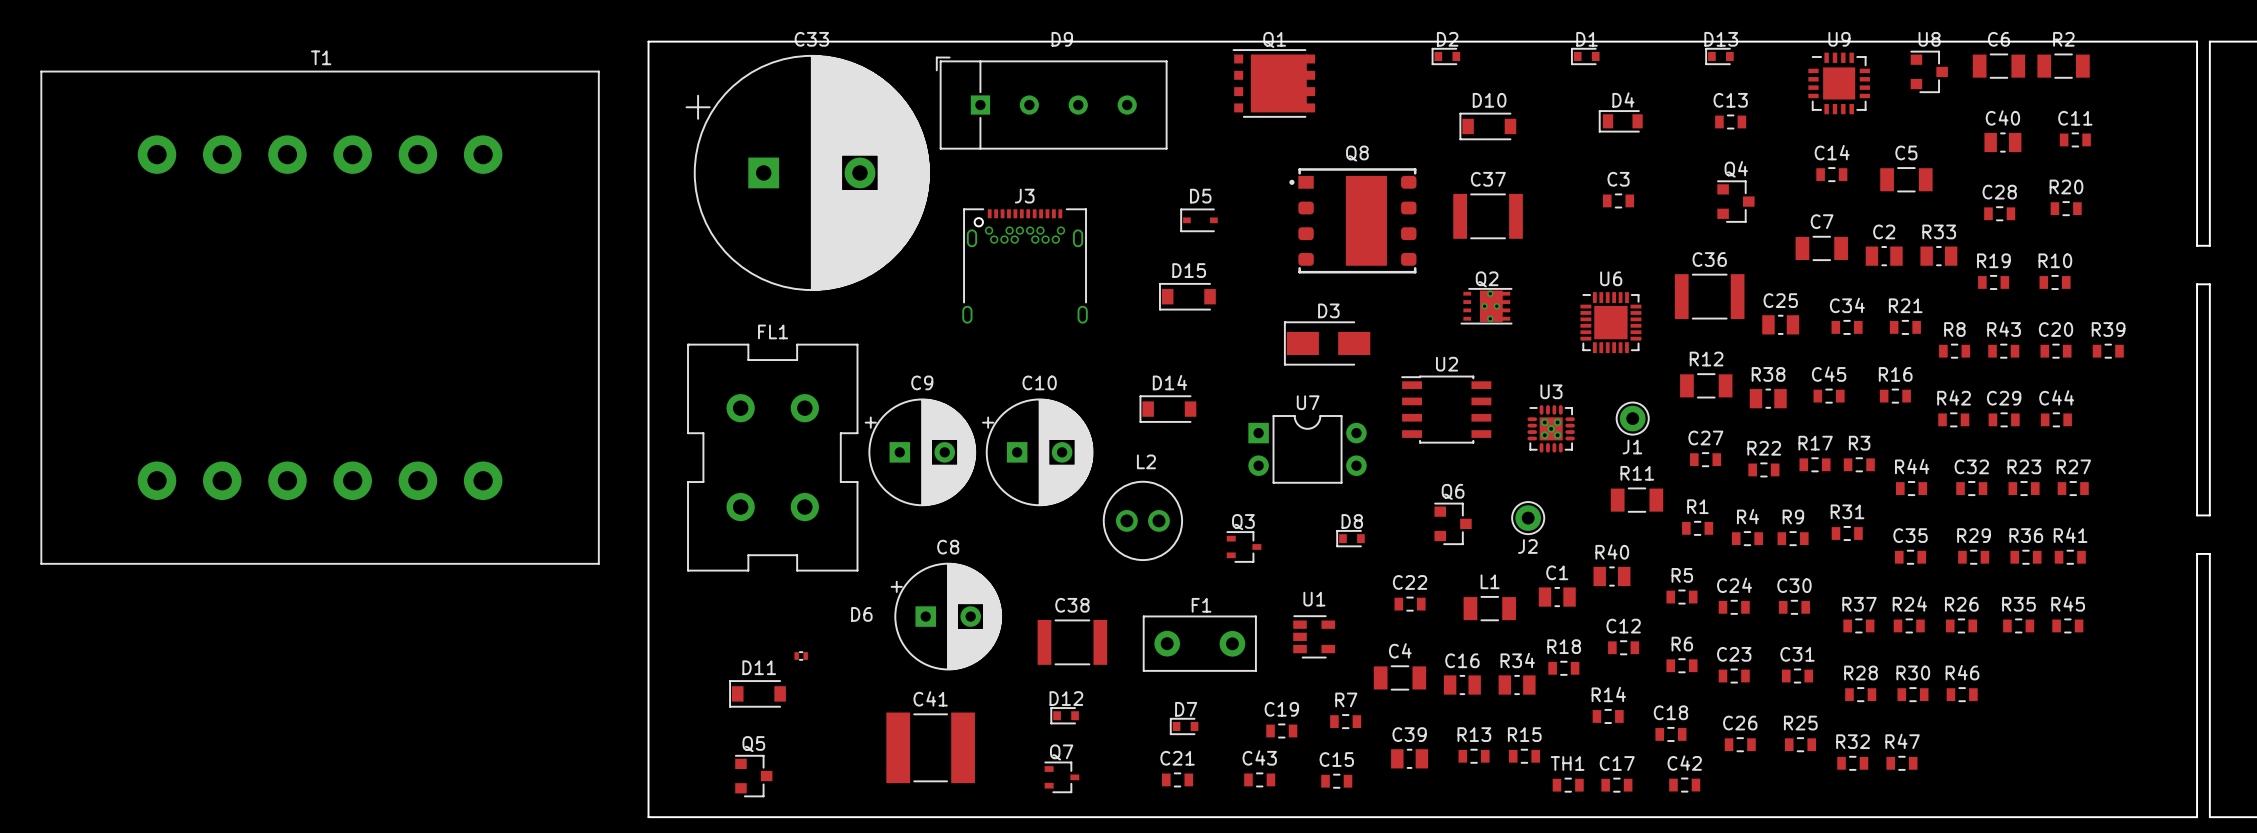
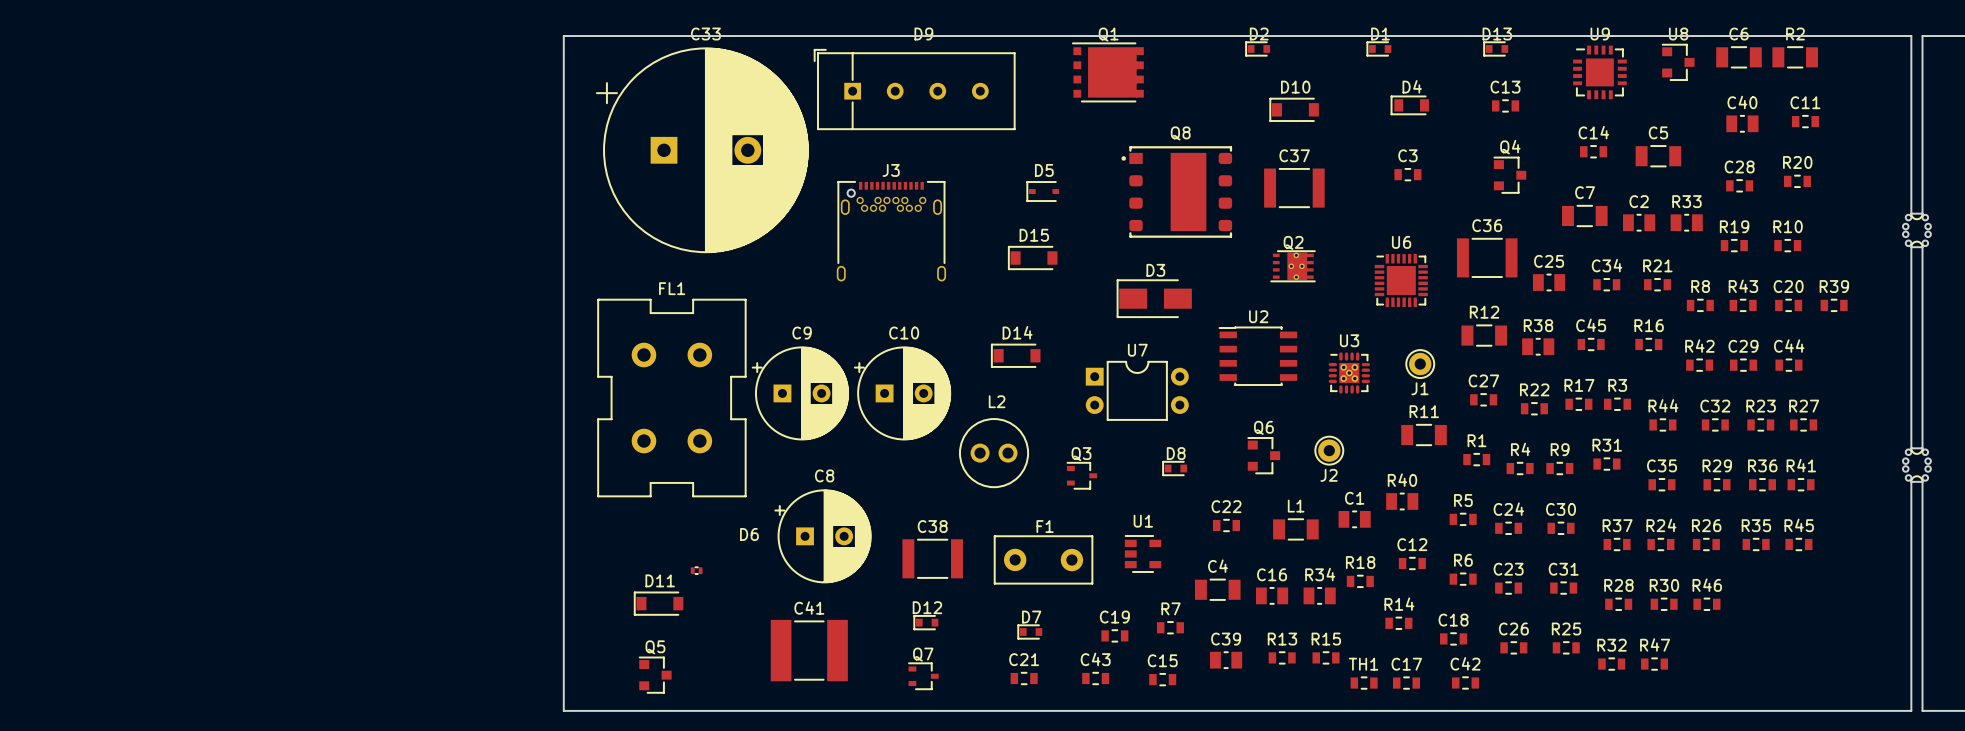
part: none -> (1916, 230)
T1: (320, 317) -> none
part: none -> (1916, 465)

